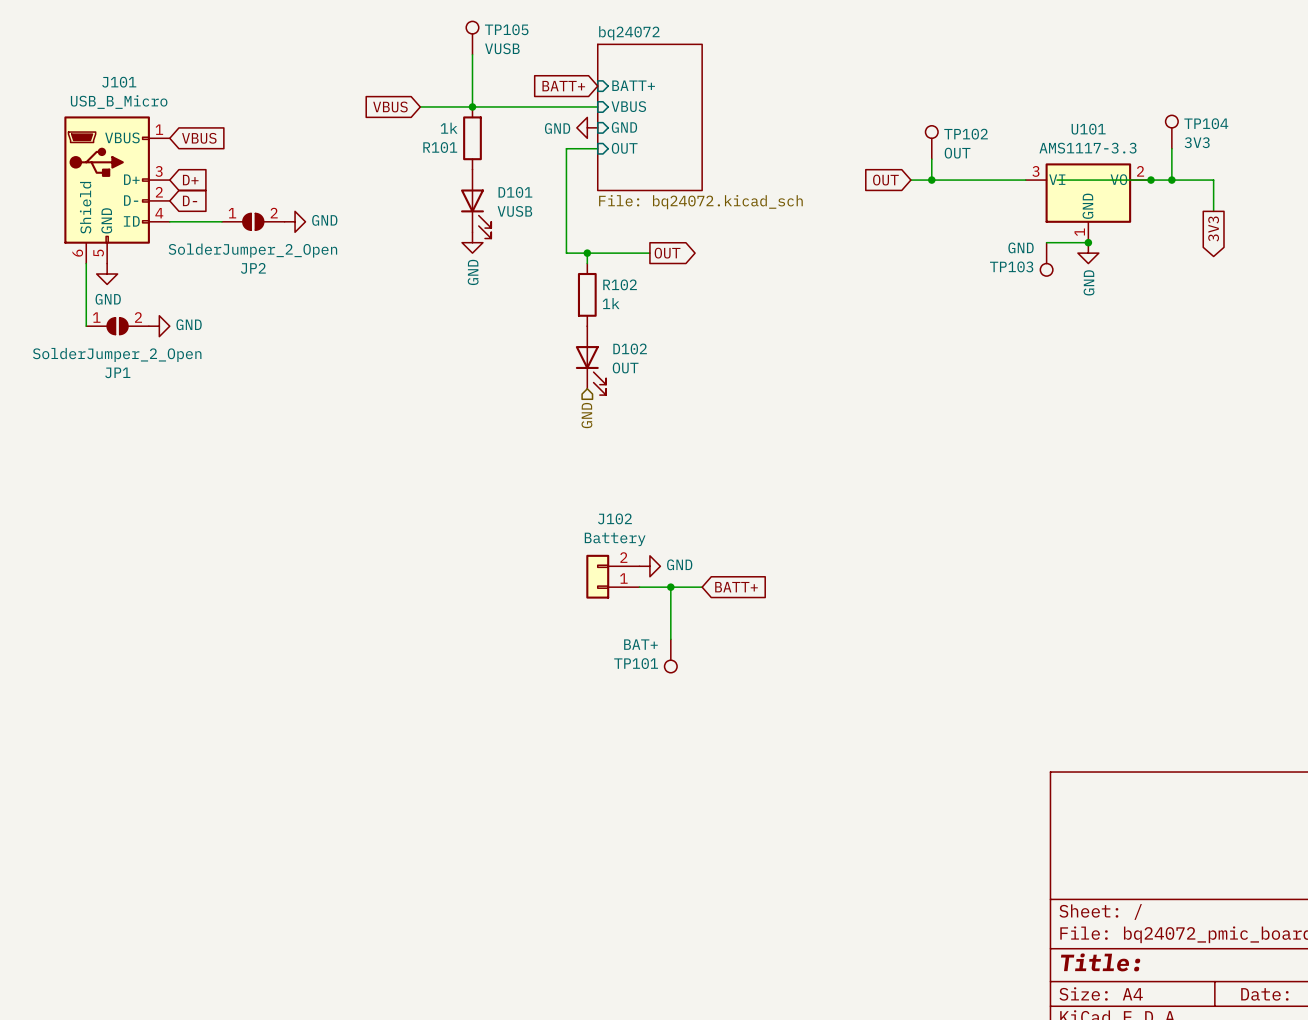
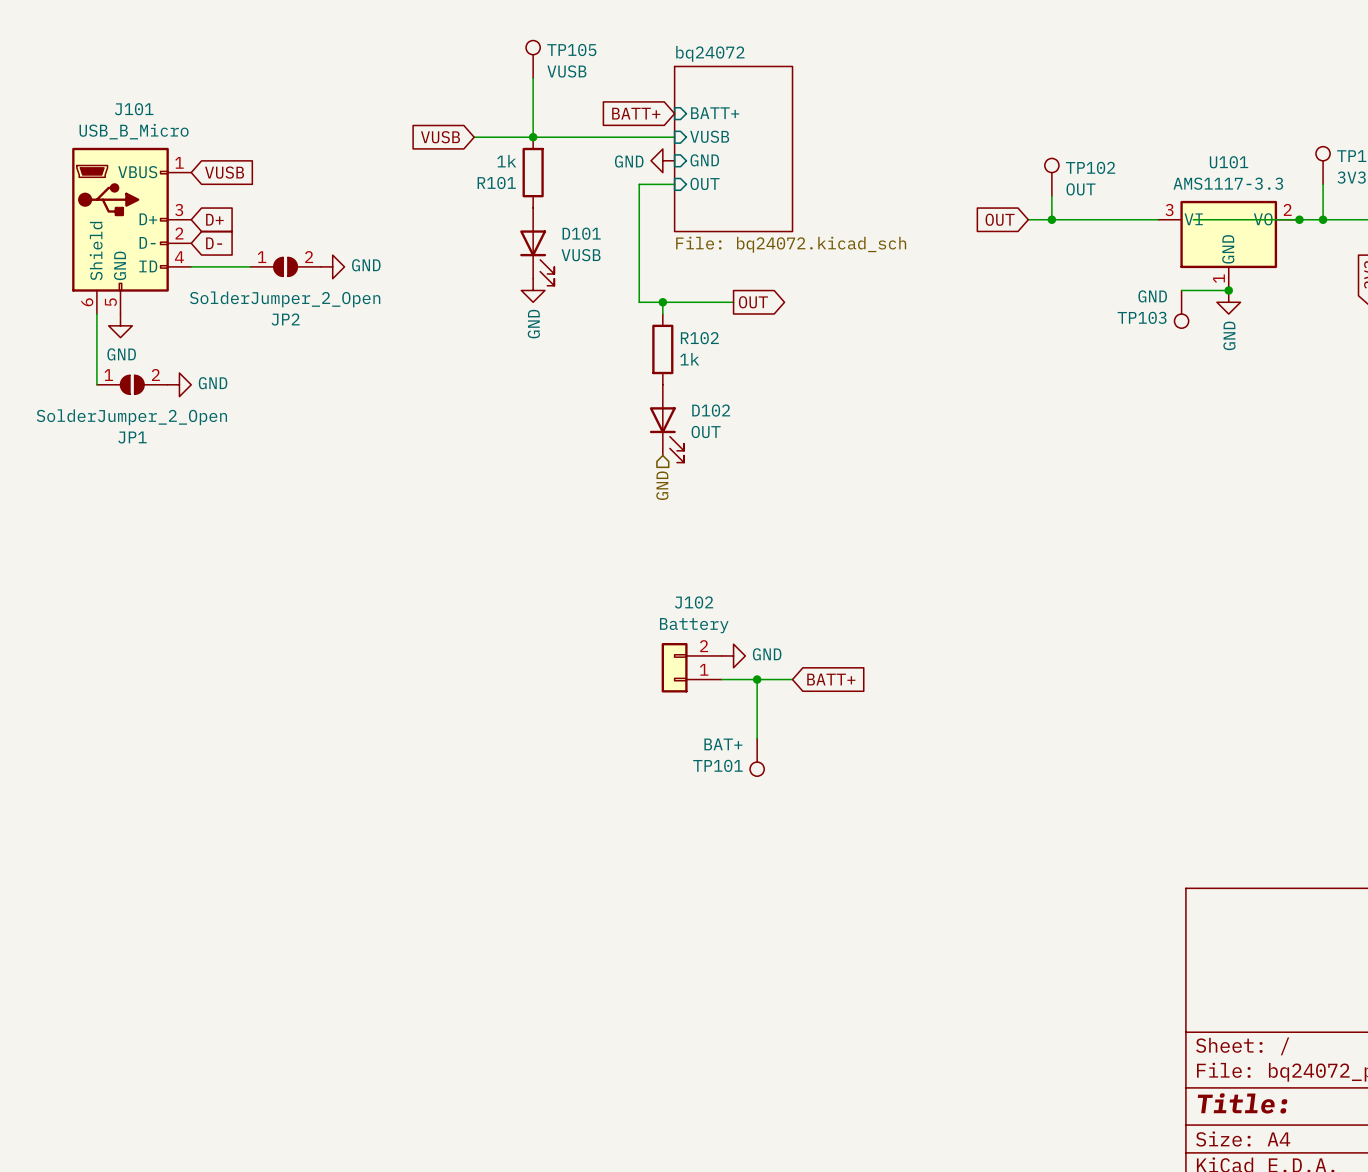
global label: VBUS (390, 106) -> VUSB (440, 137)
sheet pin: VBUS (628, 106) -> VUSB (709, 136)
global label: VBUS (199, 138) -> VUSB (224, 172)

